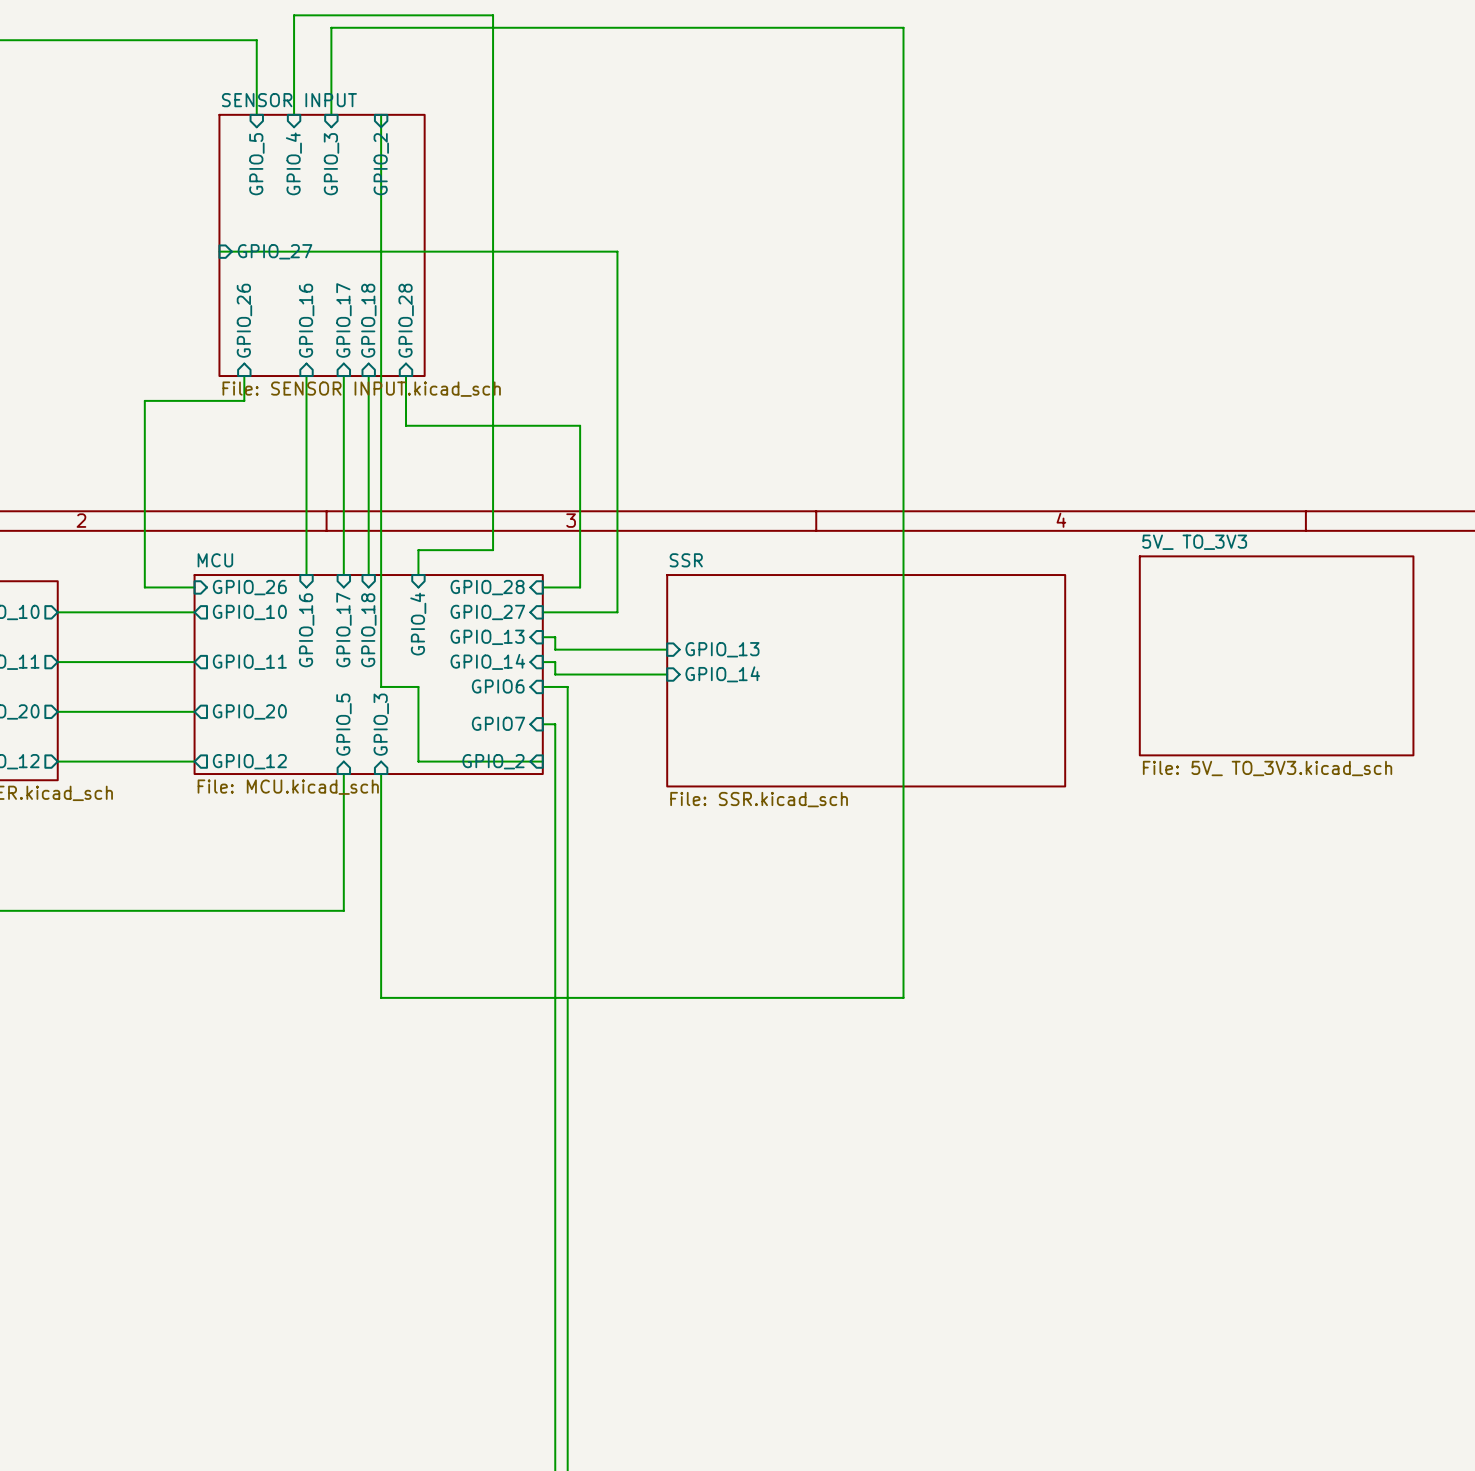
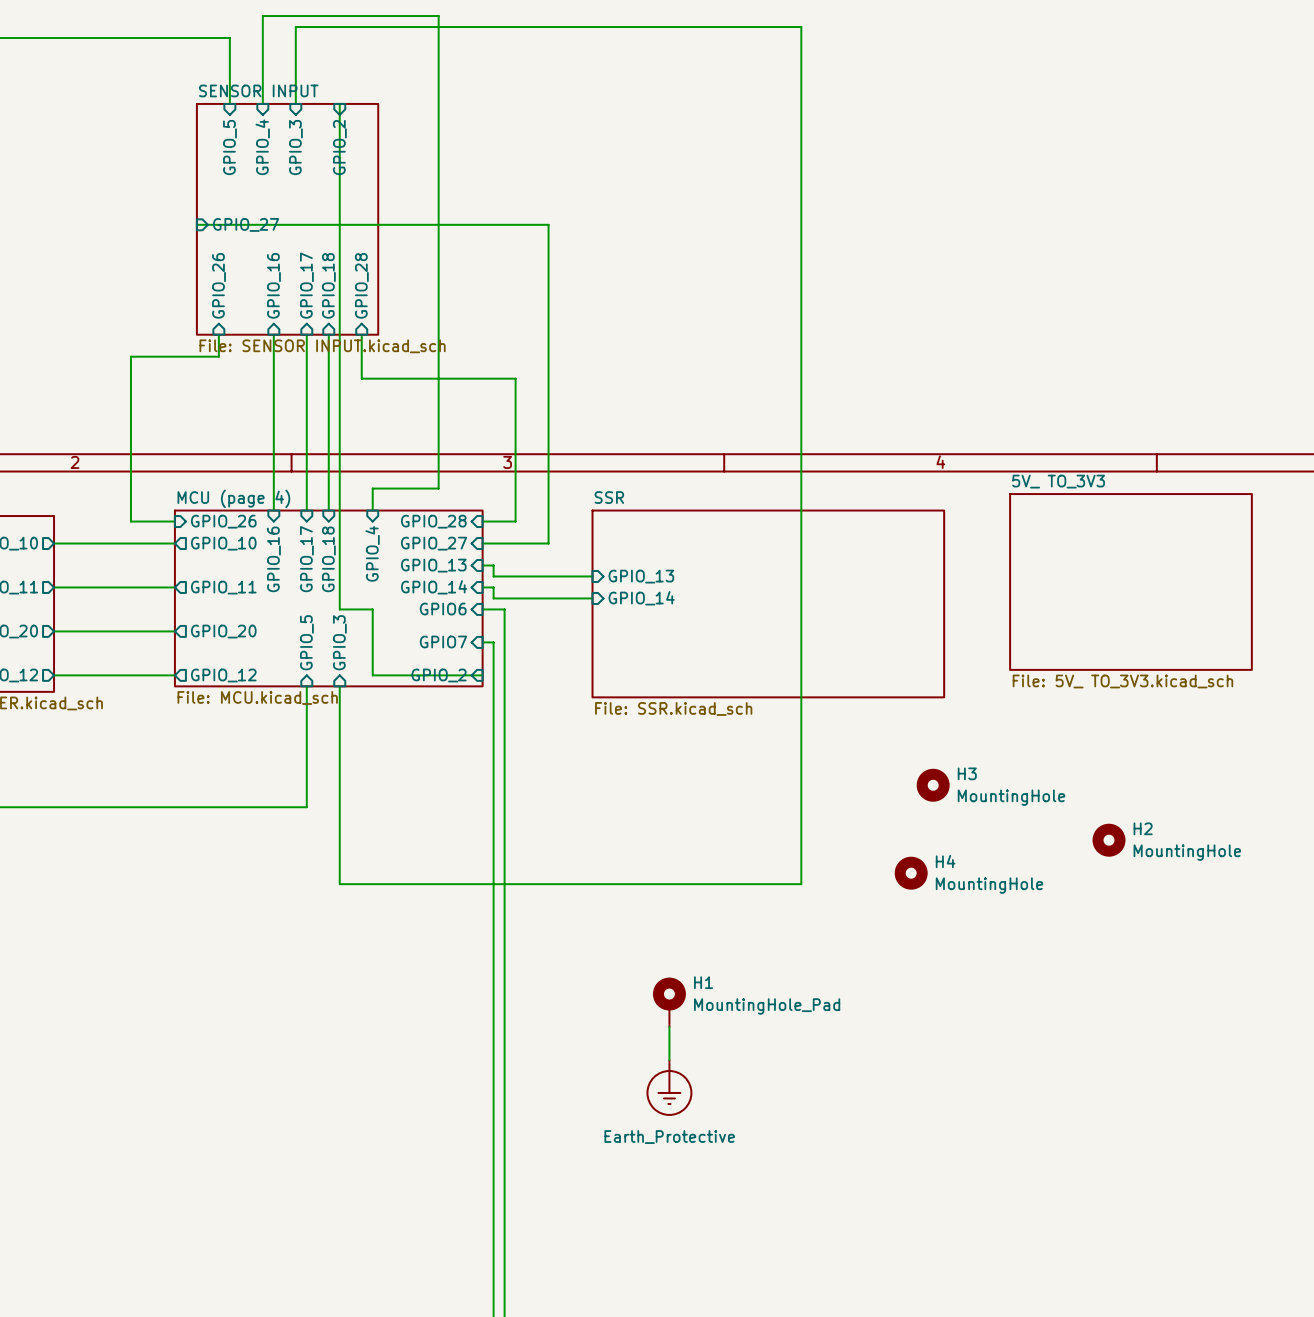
sheet MCU name: MCU (215, 560) -> MCU (page 4) (233, 498)
H3: none -> MountingHole (933, 785)
H2: none -> MountingHole (1109, 840)
H4: none -> MountingHole (911, 873)
H1: none -> MountingHole_Pad (669, 1002)
wire: none -> (669, 1027) (669, 1060)
power symbol: none -> Earth_Protective (669, 1087)

